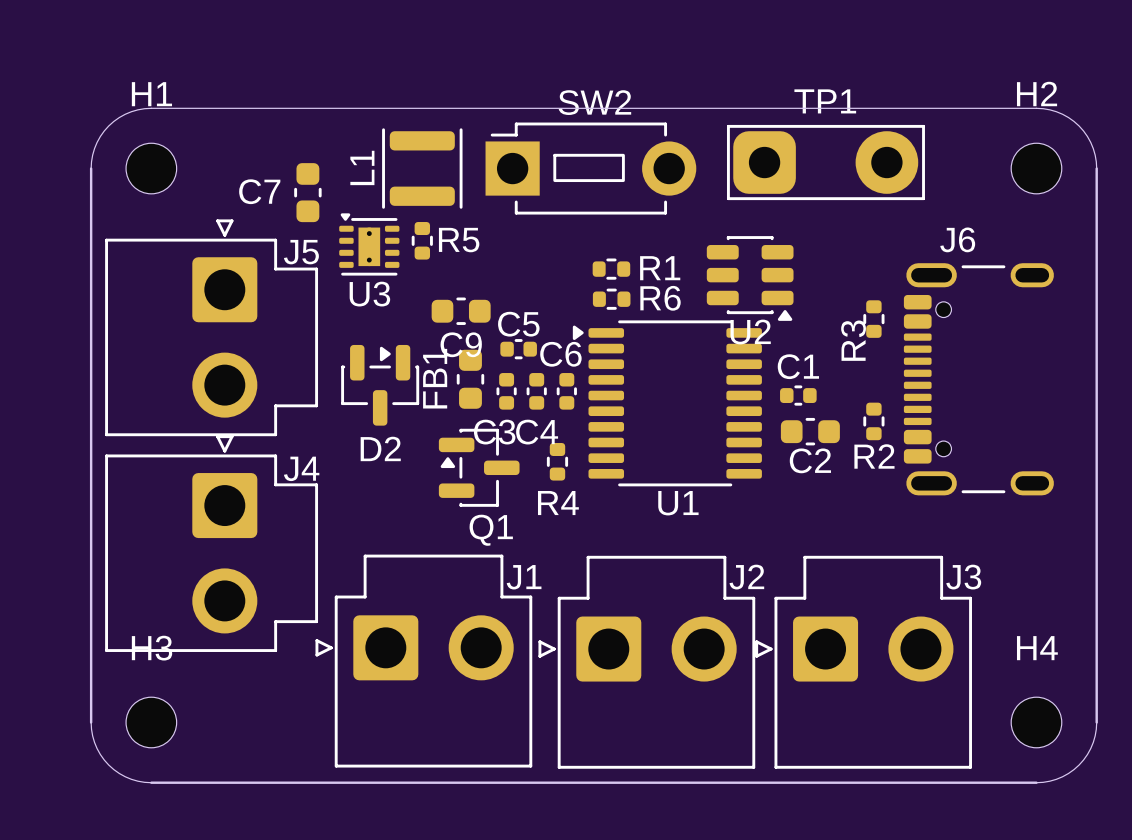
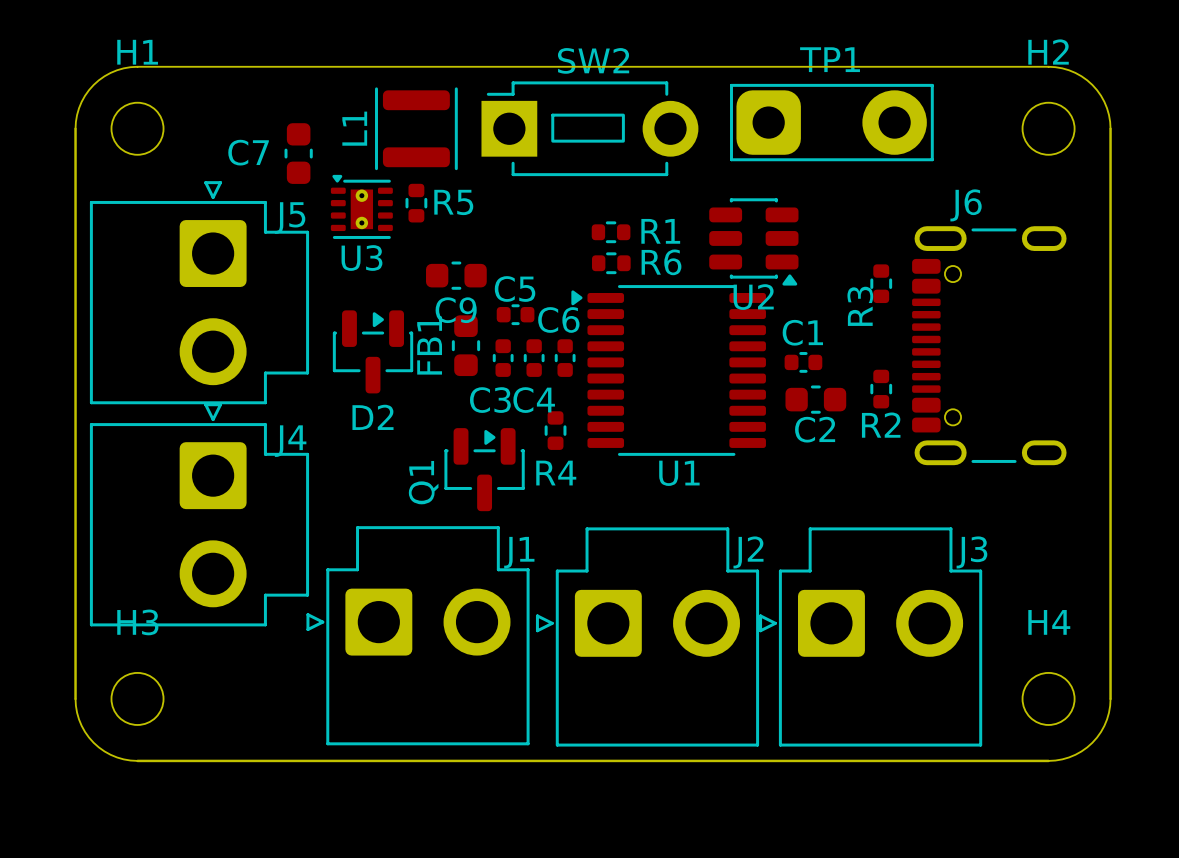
Q1 rotation: 0° (479, 467) -> 90° clockwise (484, 469)

